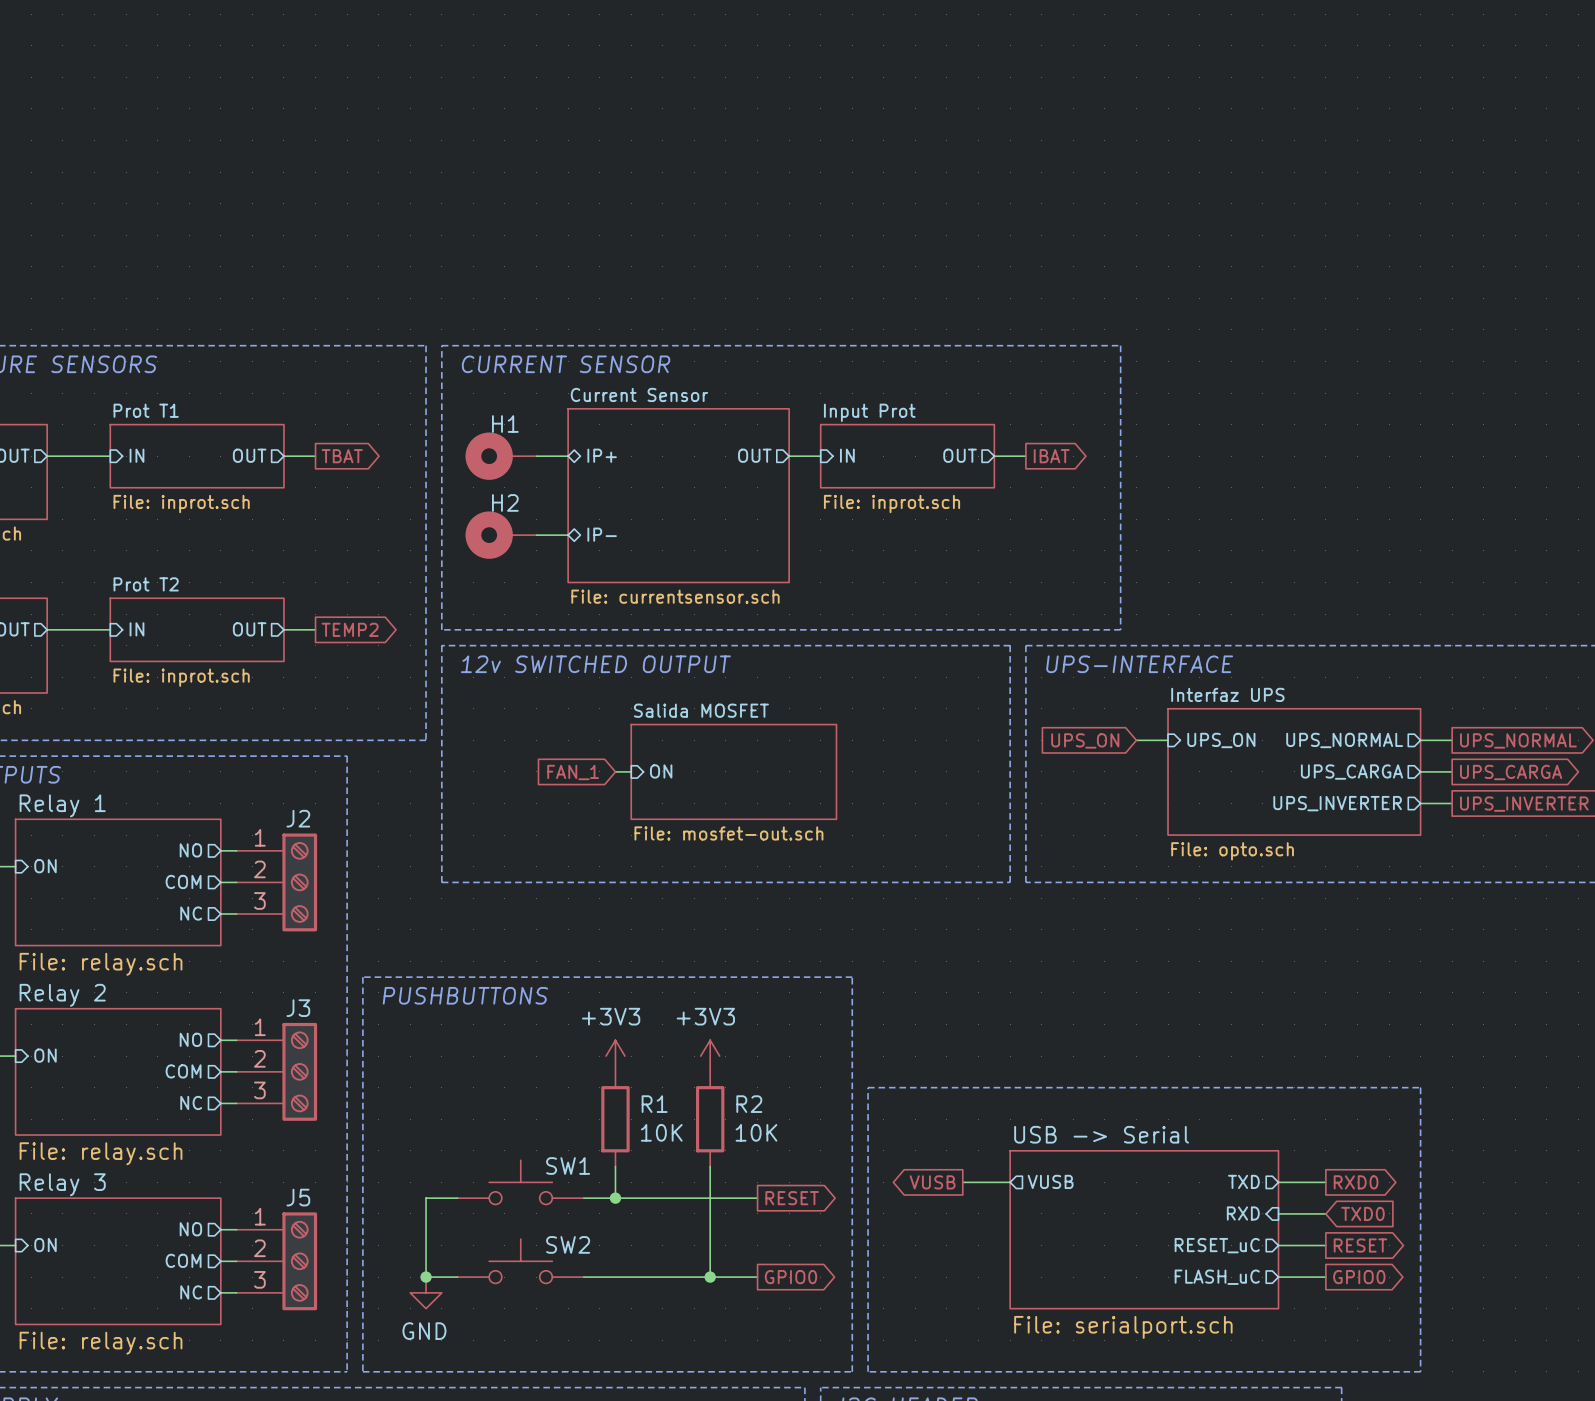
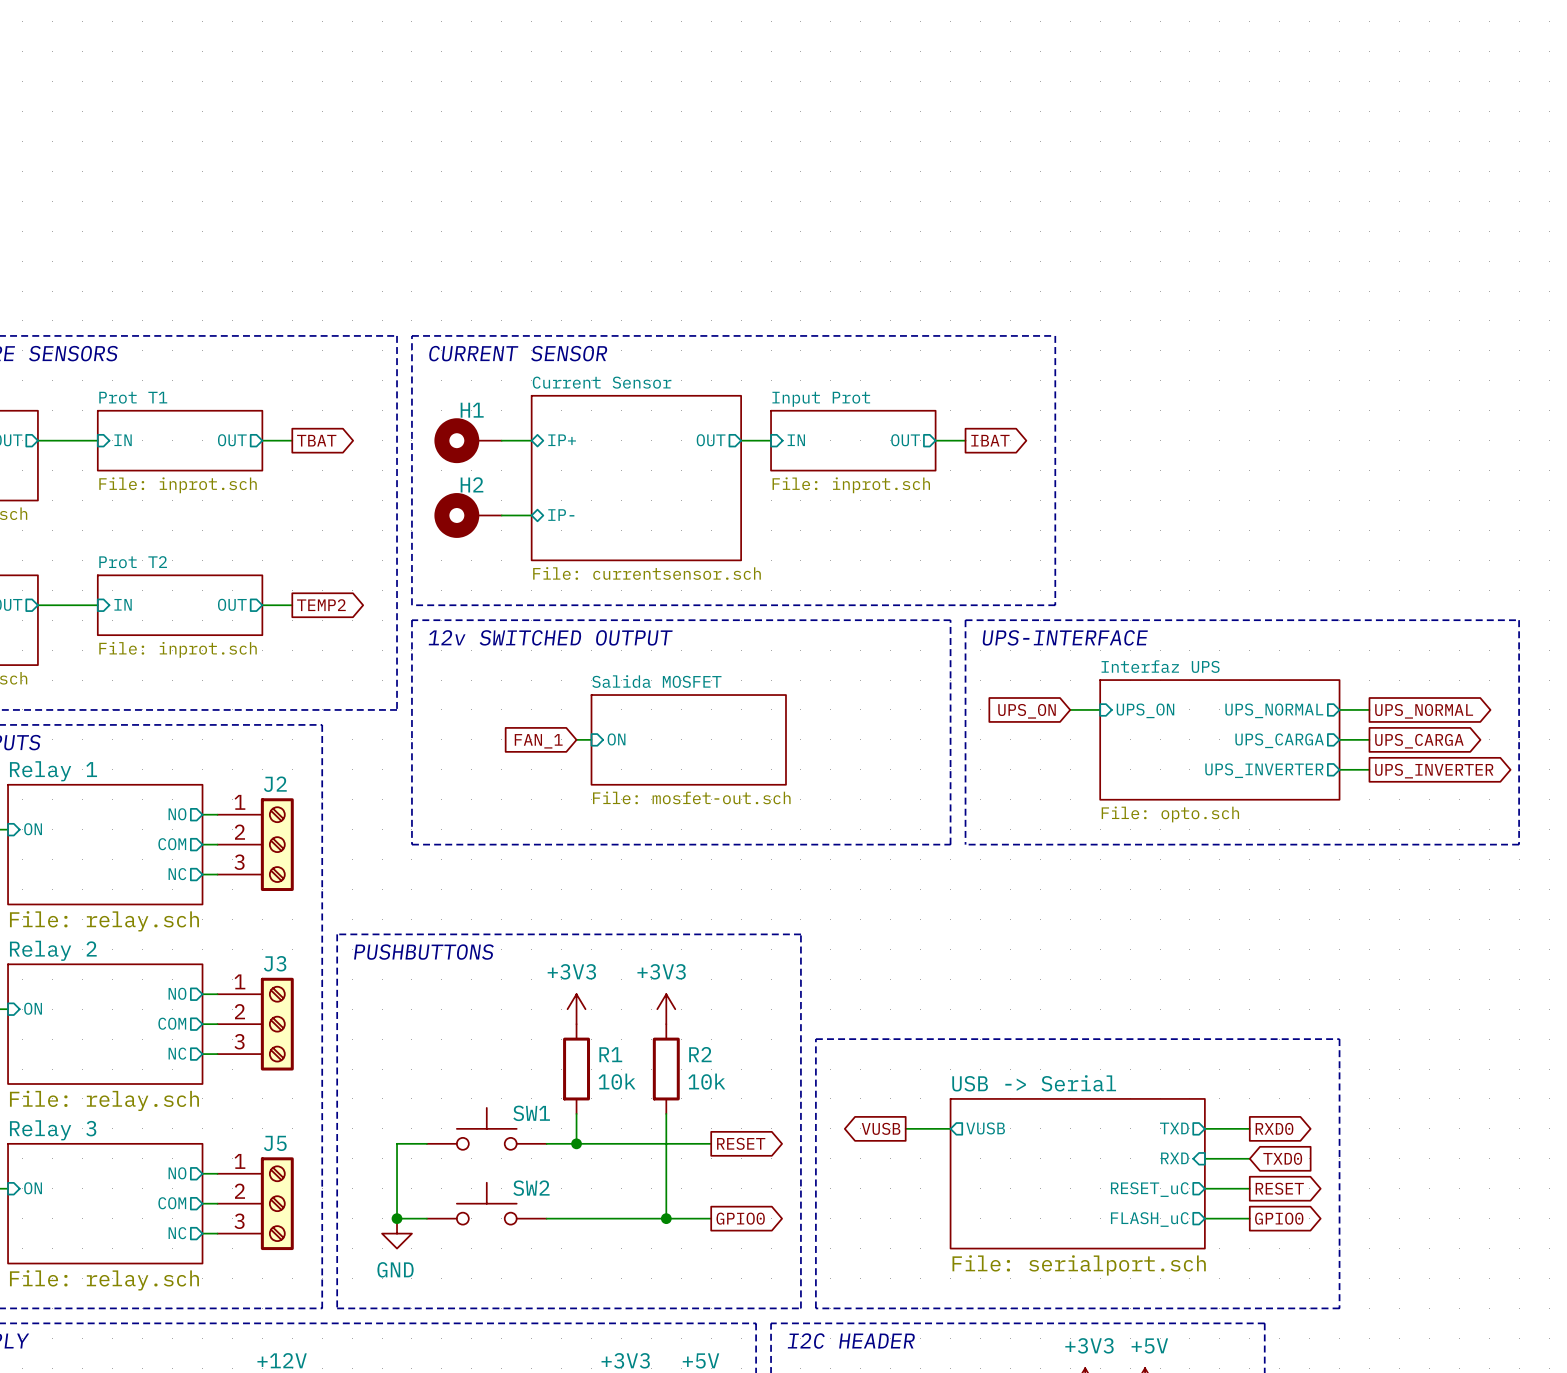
R1 value: 10K (661, 1132) -> 10k (617, 1081)
R2 value: 10K (756, 1132) -> 10k (706, 1081)

